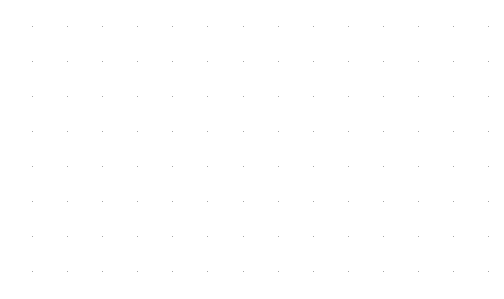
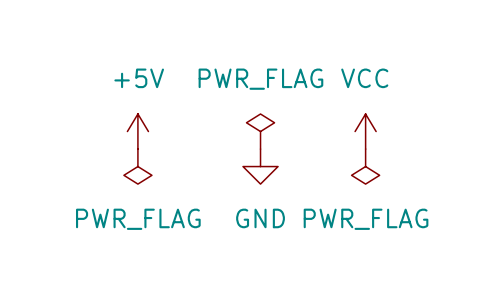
power symbol: none -> +5V (137, 131)
power symbol: none -> PWR_FLAG (260, 131)
power symbol: none -> VCC (365, 131)
power symbol: none -> PWR_FLAG (137, 166)
power symbol: none -> GND (260, 166)
power symbol: none -> PWR_FLAG (365, 166)

